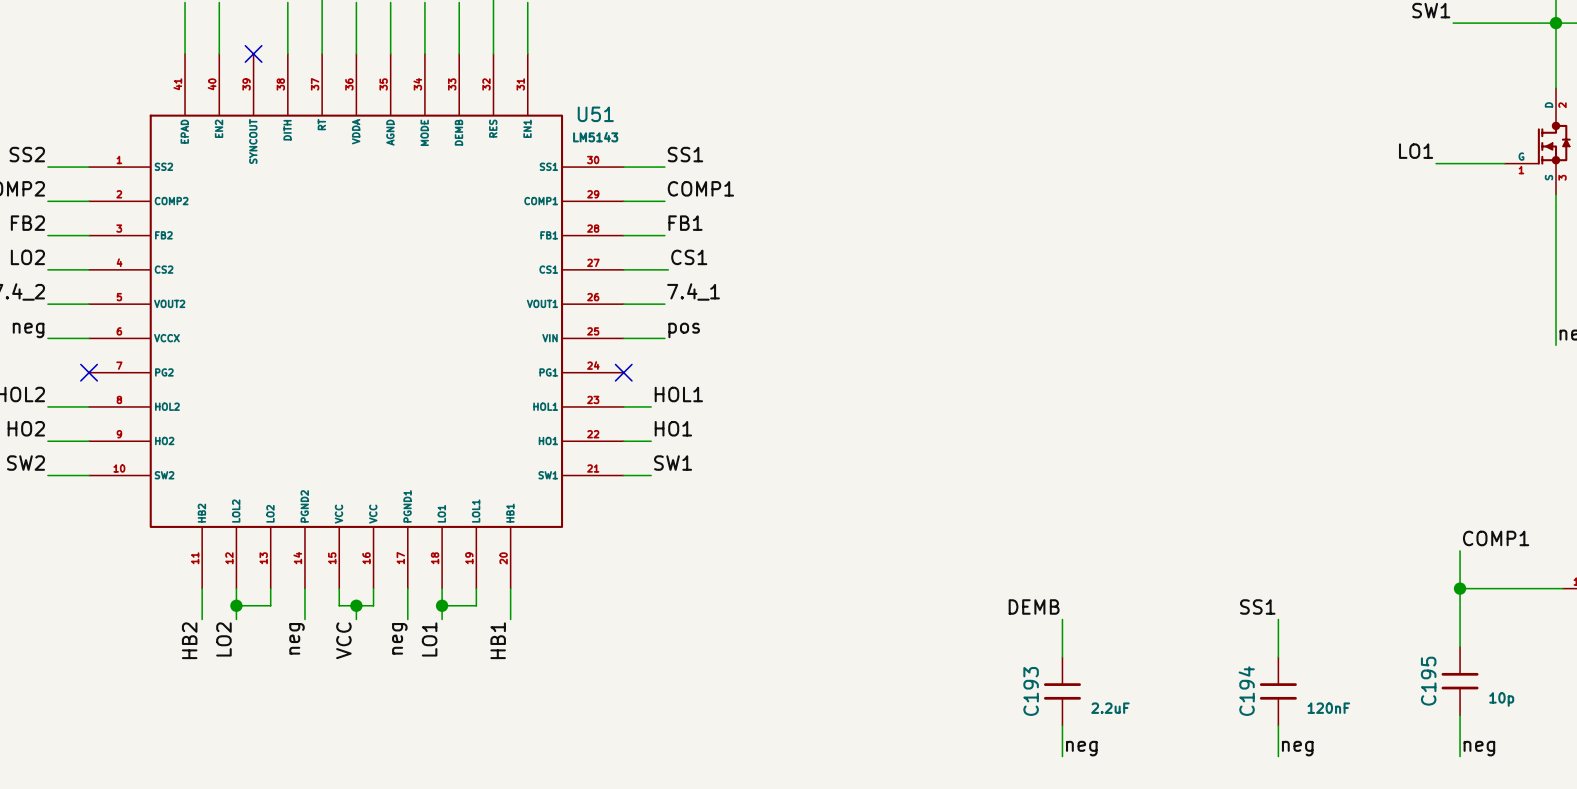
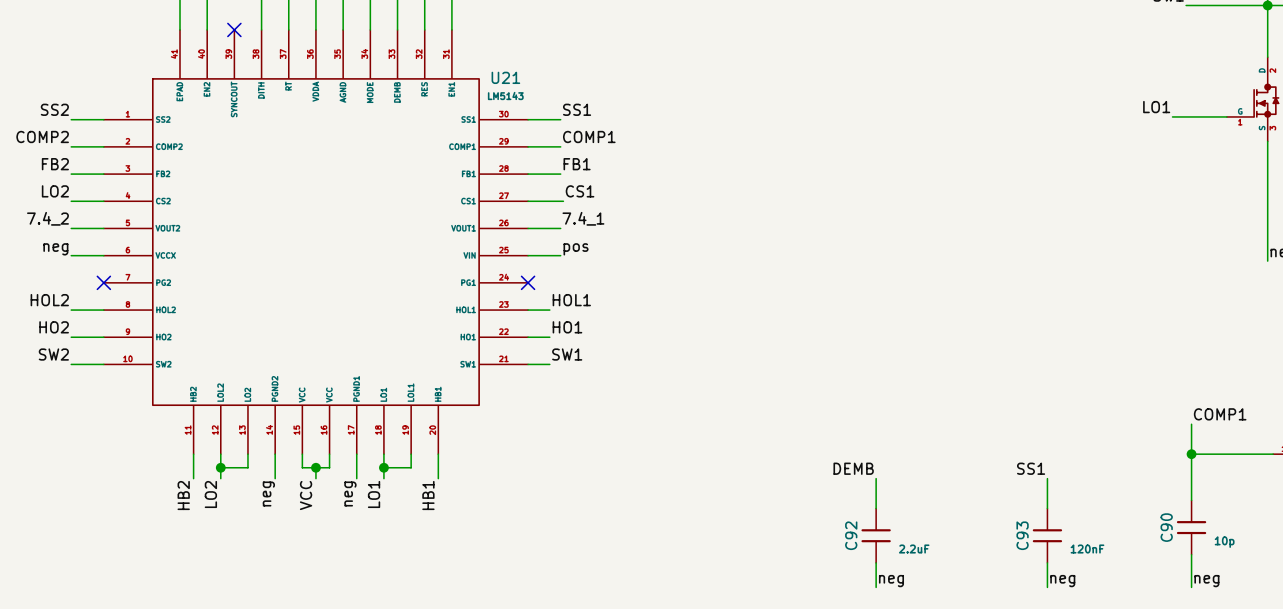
U51 name: U51 (595, 114) -> U21 (505, 77)
C195 name: C195 (1428, 681) -> C90 (1166, 527)
C193 name: C193 (1031, 691) -> C92 (851, 535)
C194 name: C194 (1246, 691) -> C93 (1022, 535)

